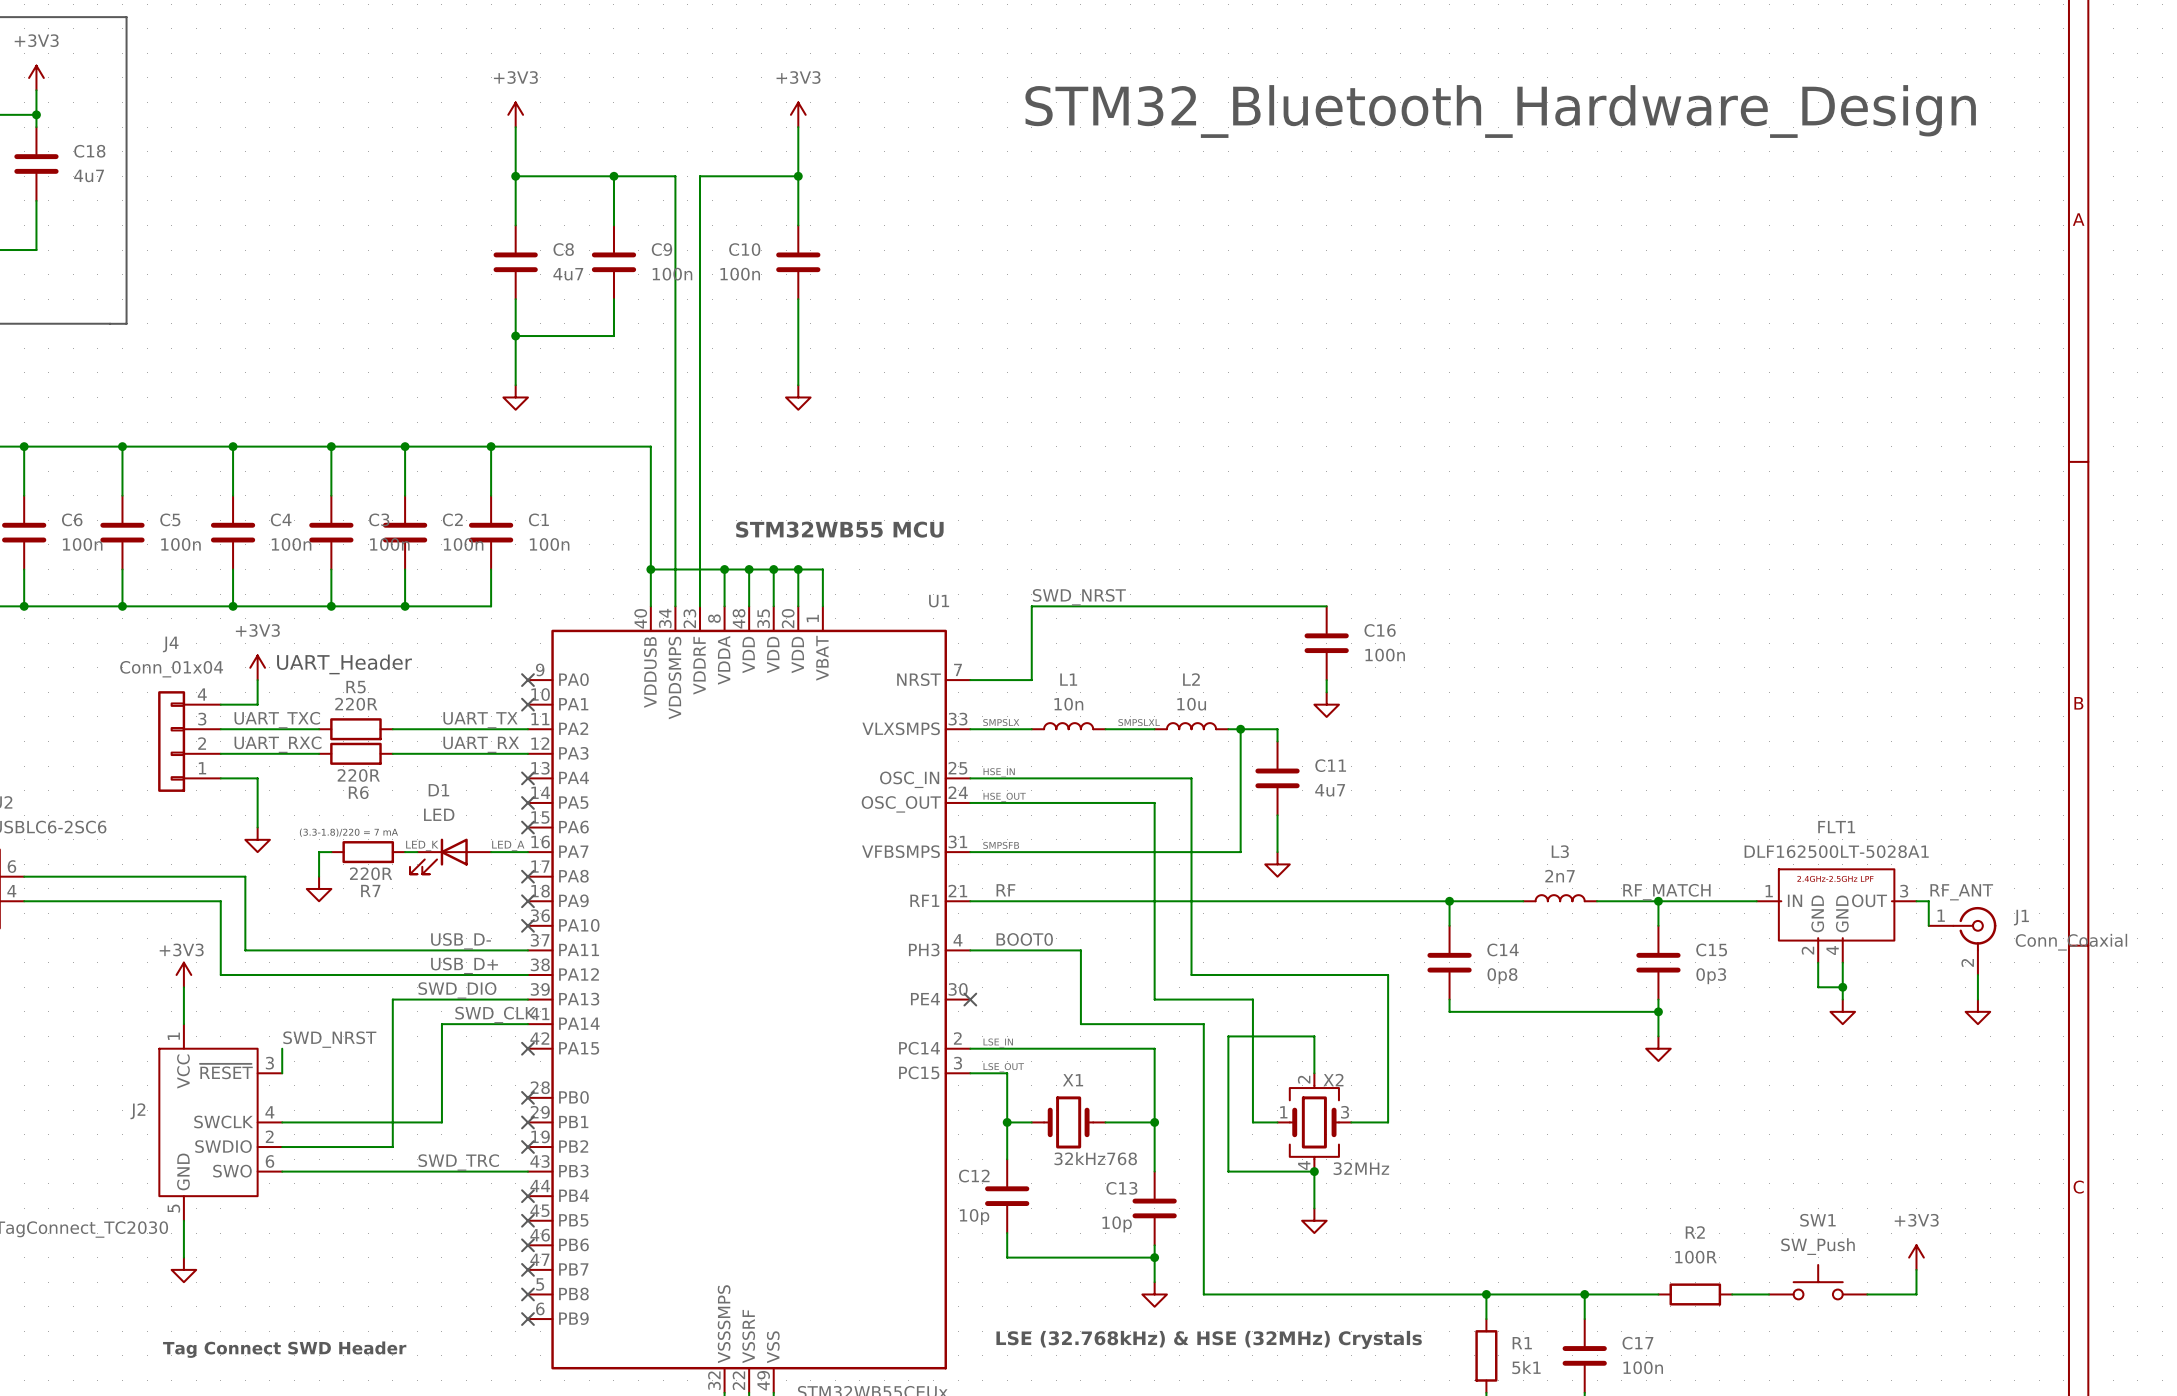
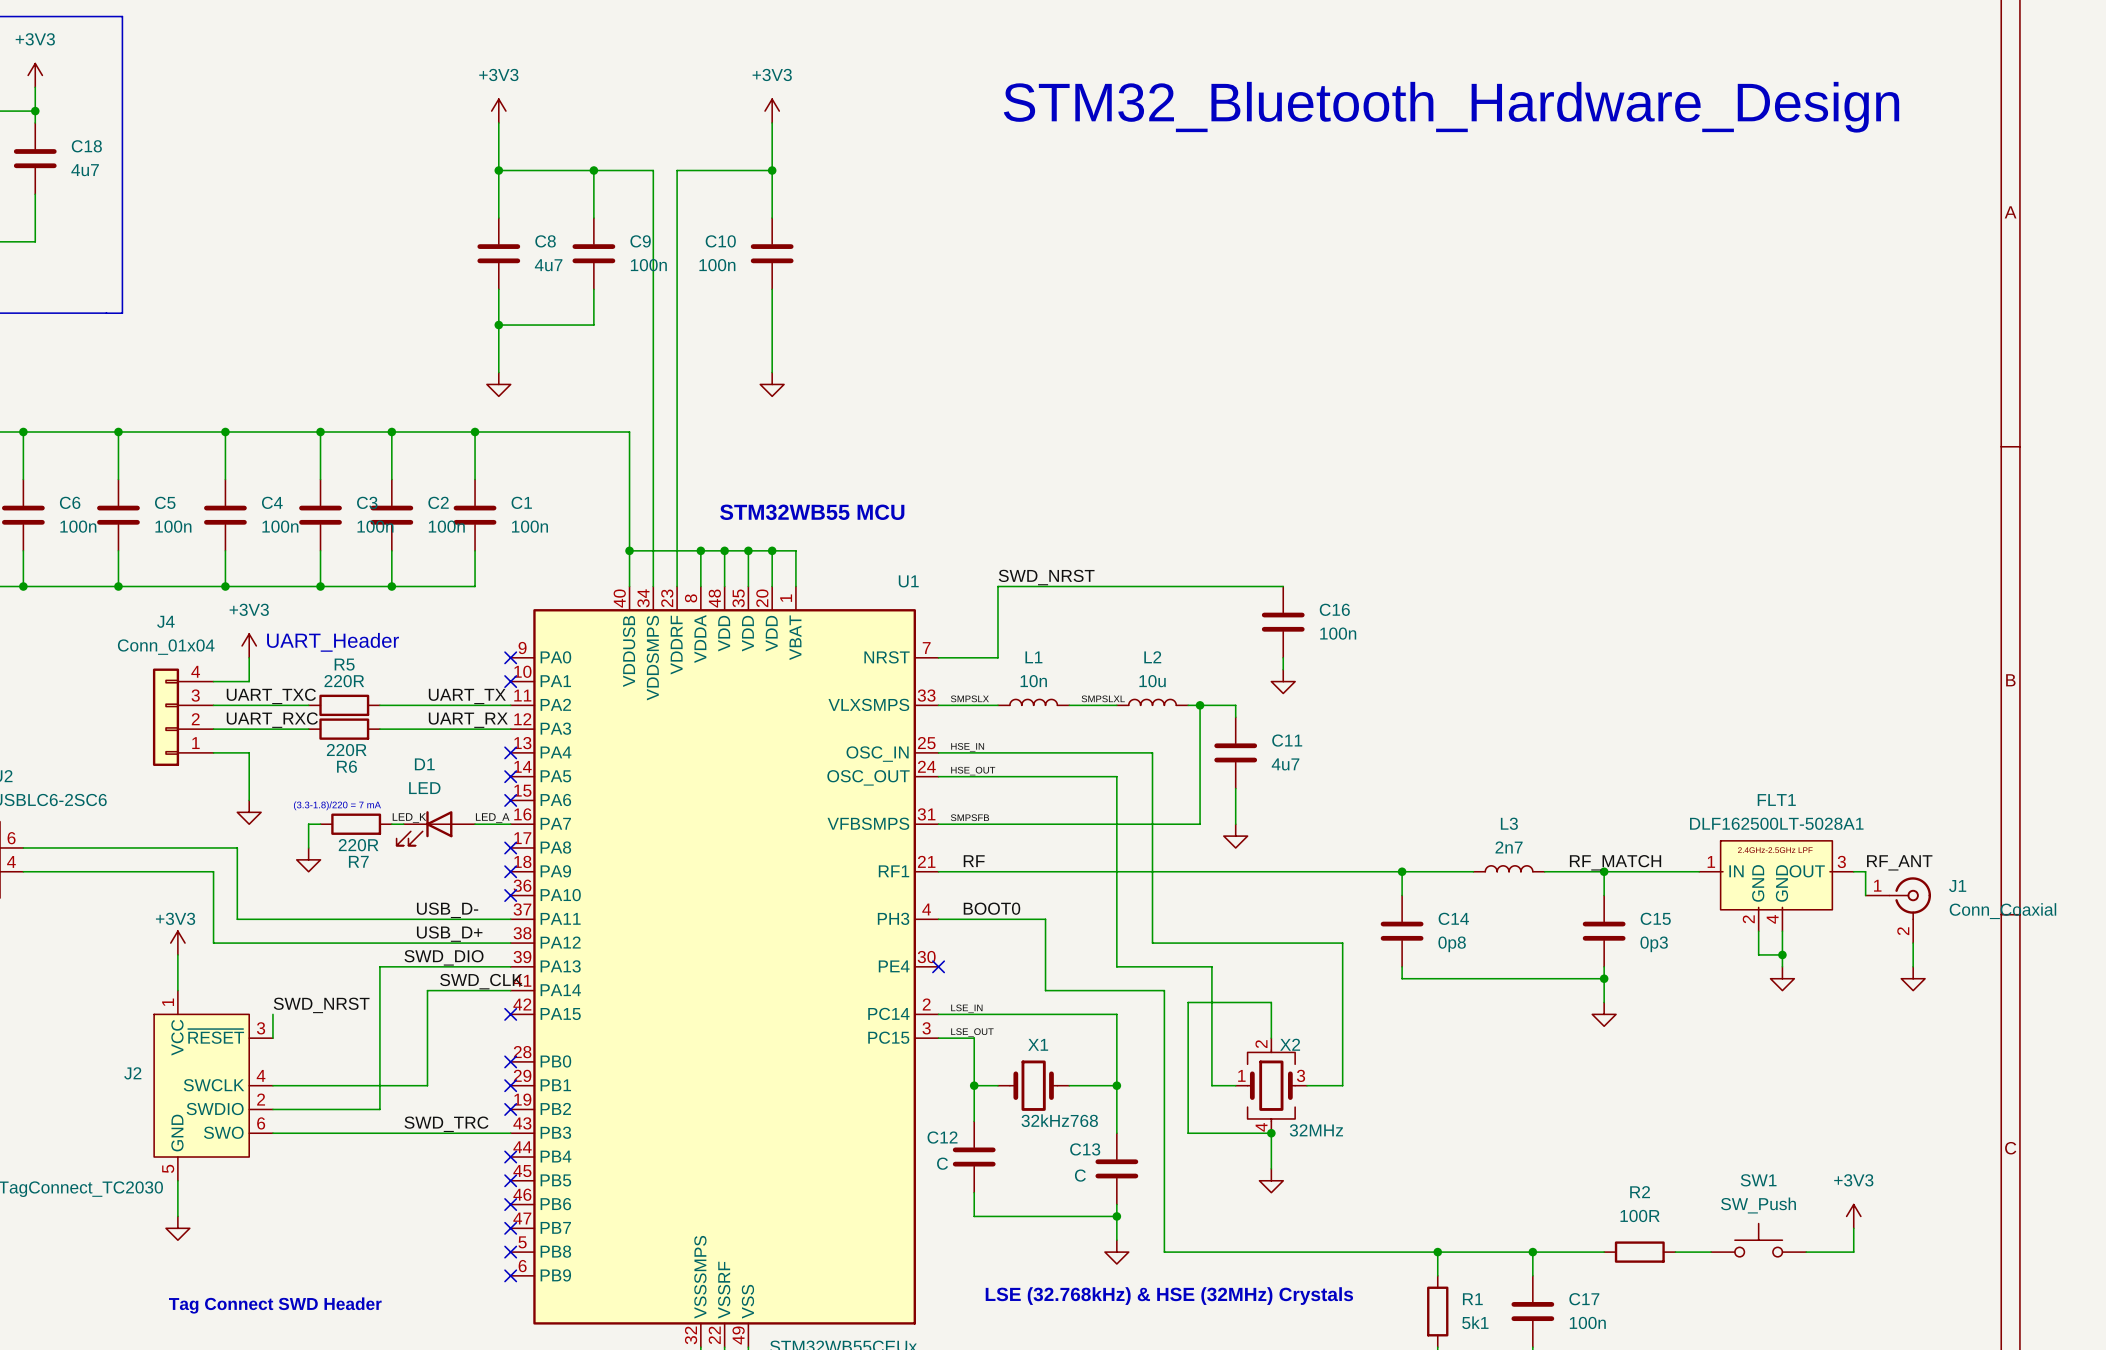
C12 value: 10p (974, 1217) -> C (942, 1163)
C13 value: 10p (1117, 1224) -> C (1080, 1175)

